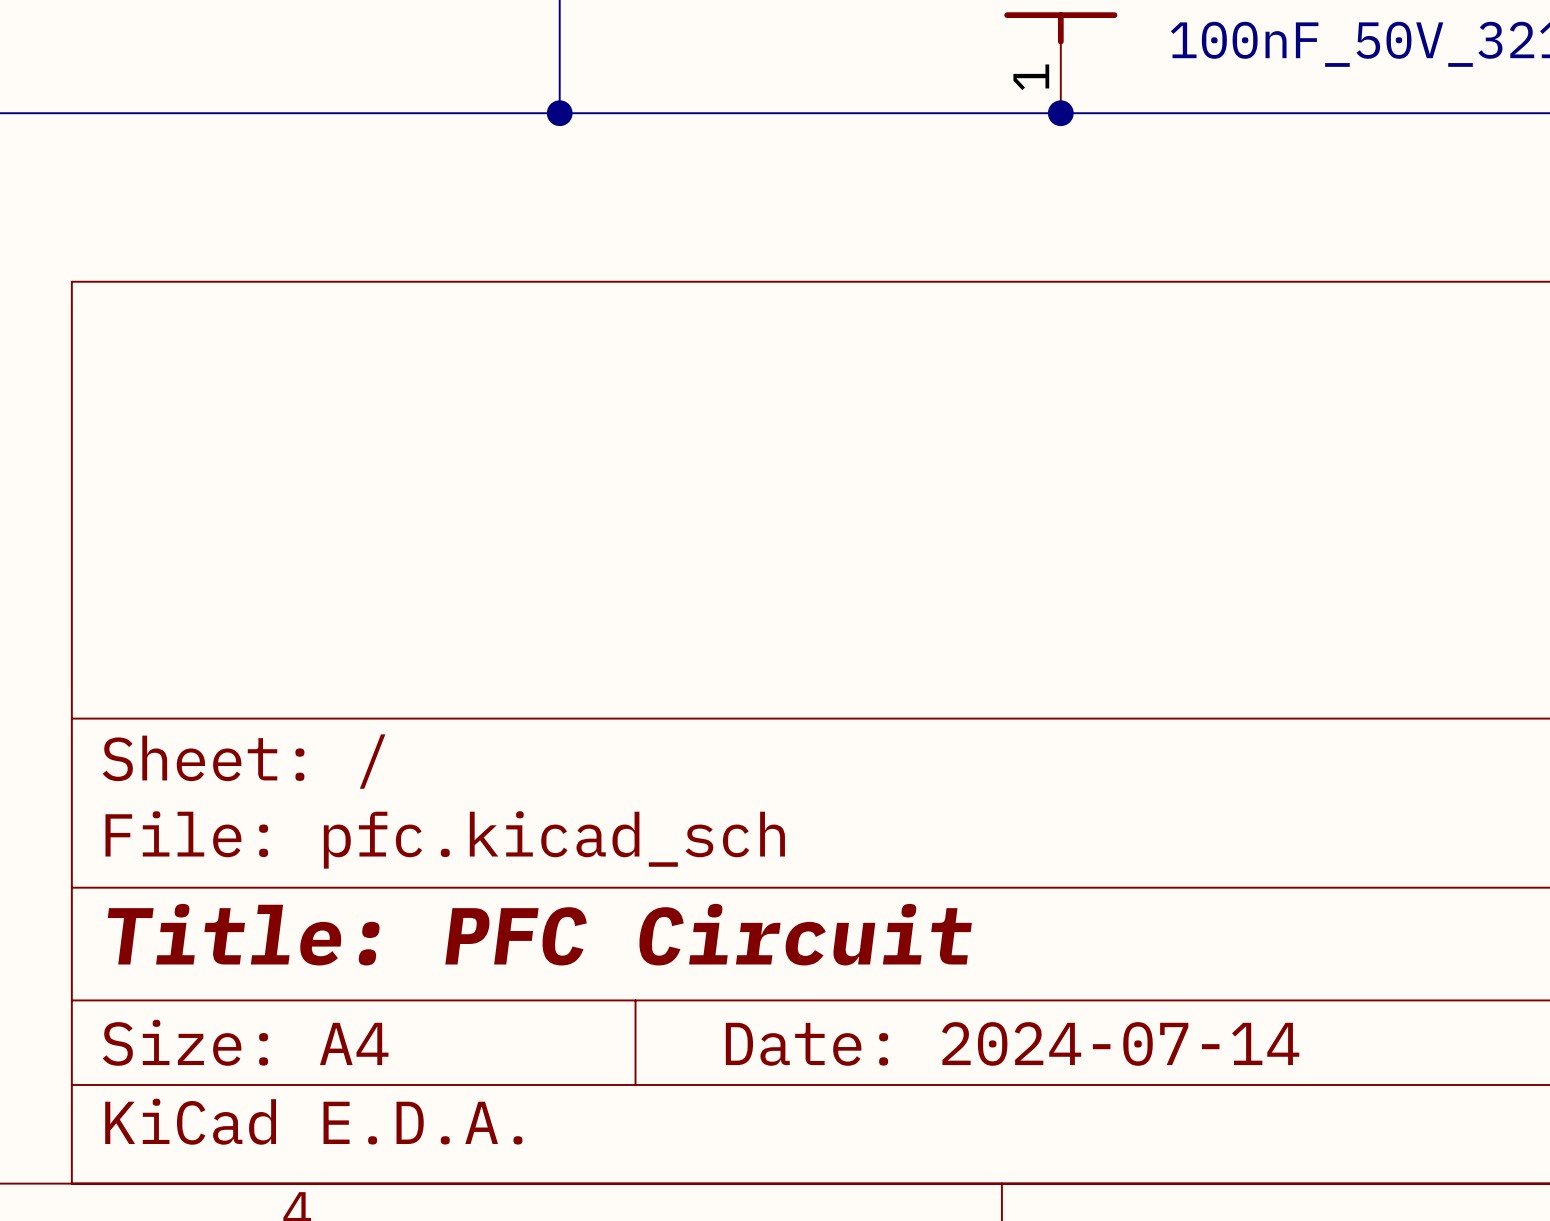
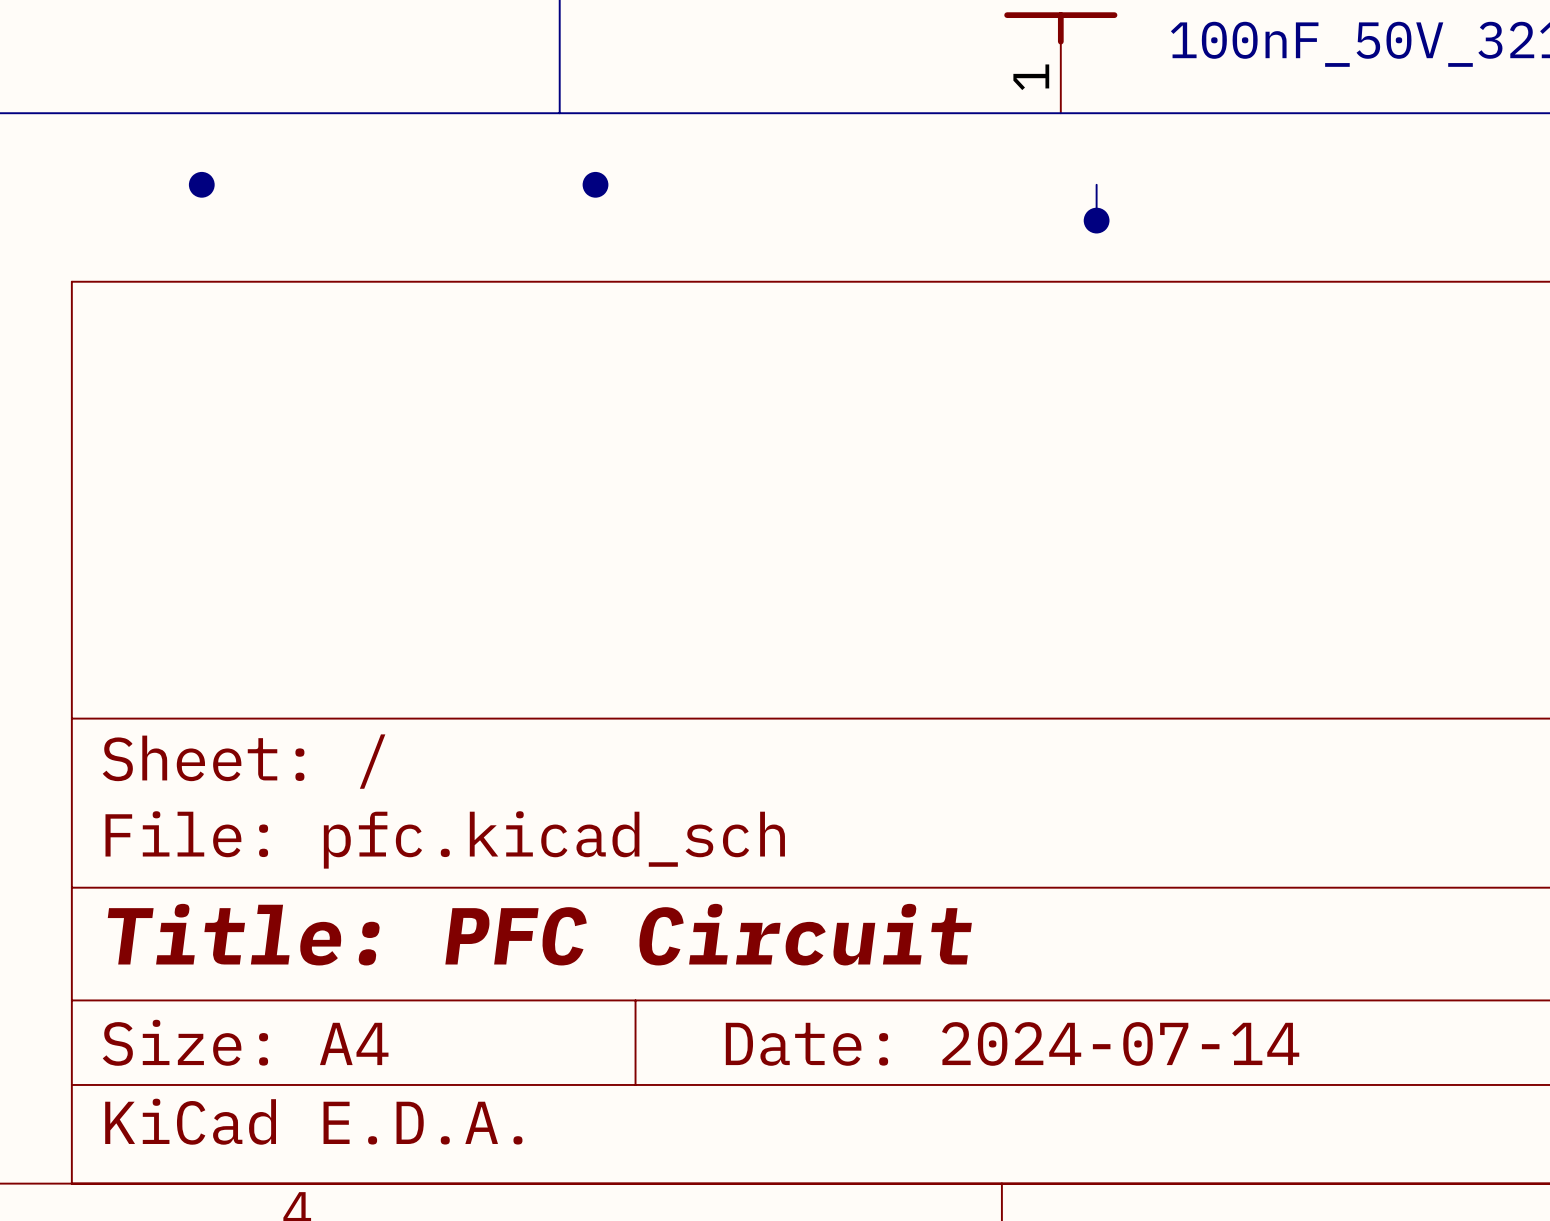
junction position: (559, 113) -> (595, 184)
junction: (1060, 113) -> none
junction: none -> (201, 184)
wire: none -> (1096, 184) (1096, 220)
junction: none -> (1096, 220)

